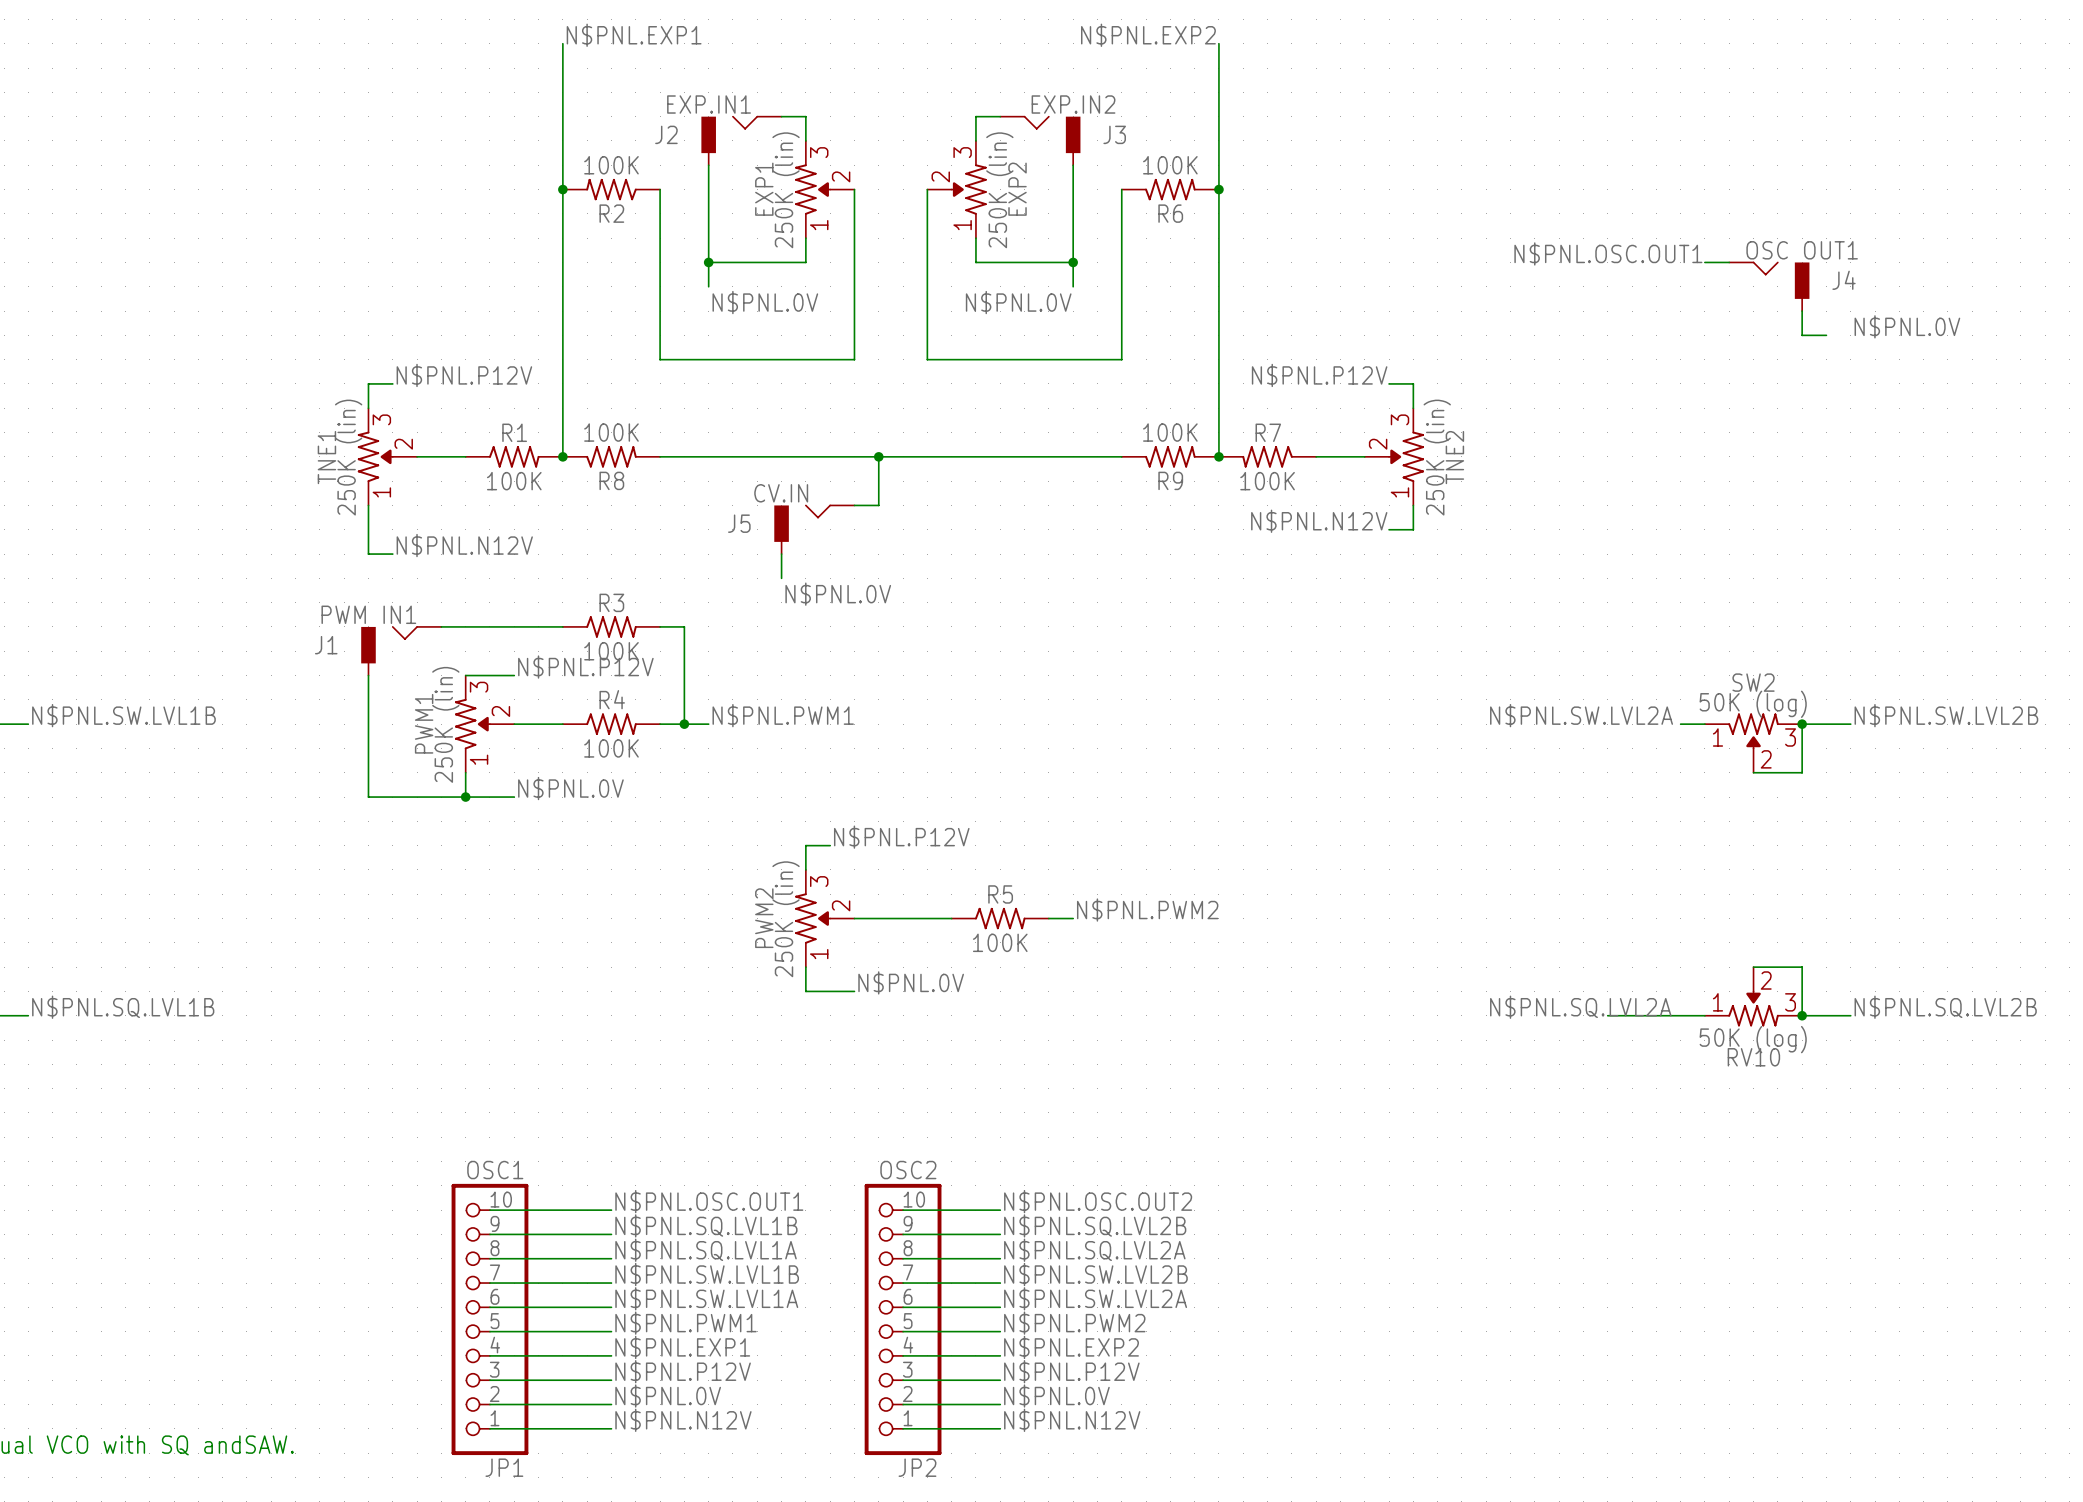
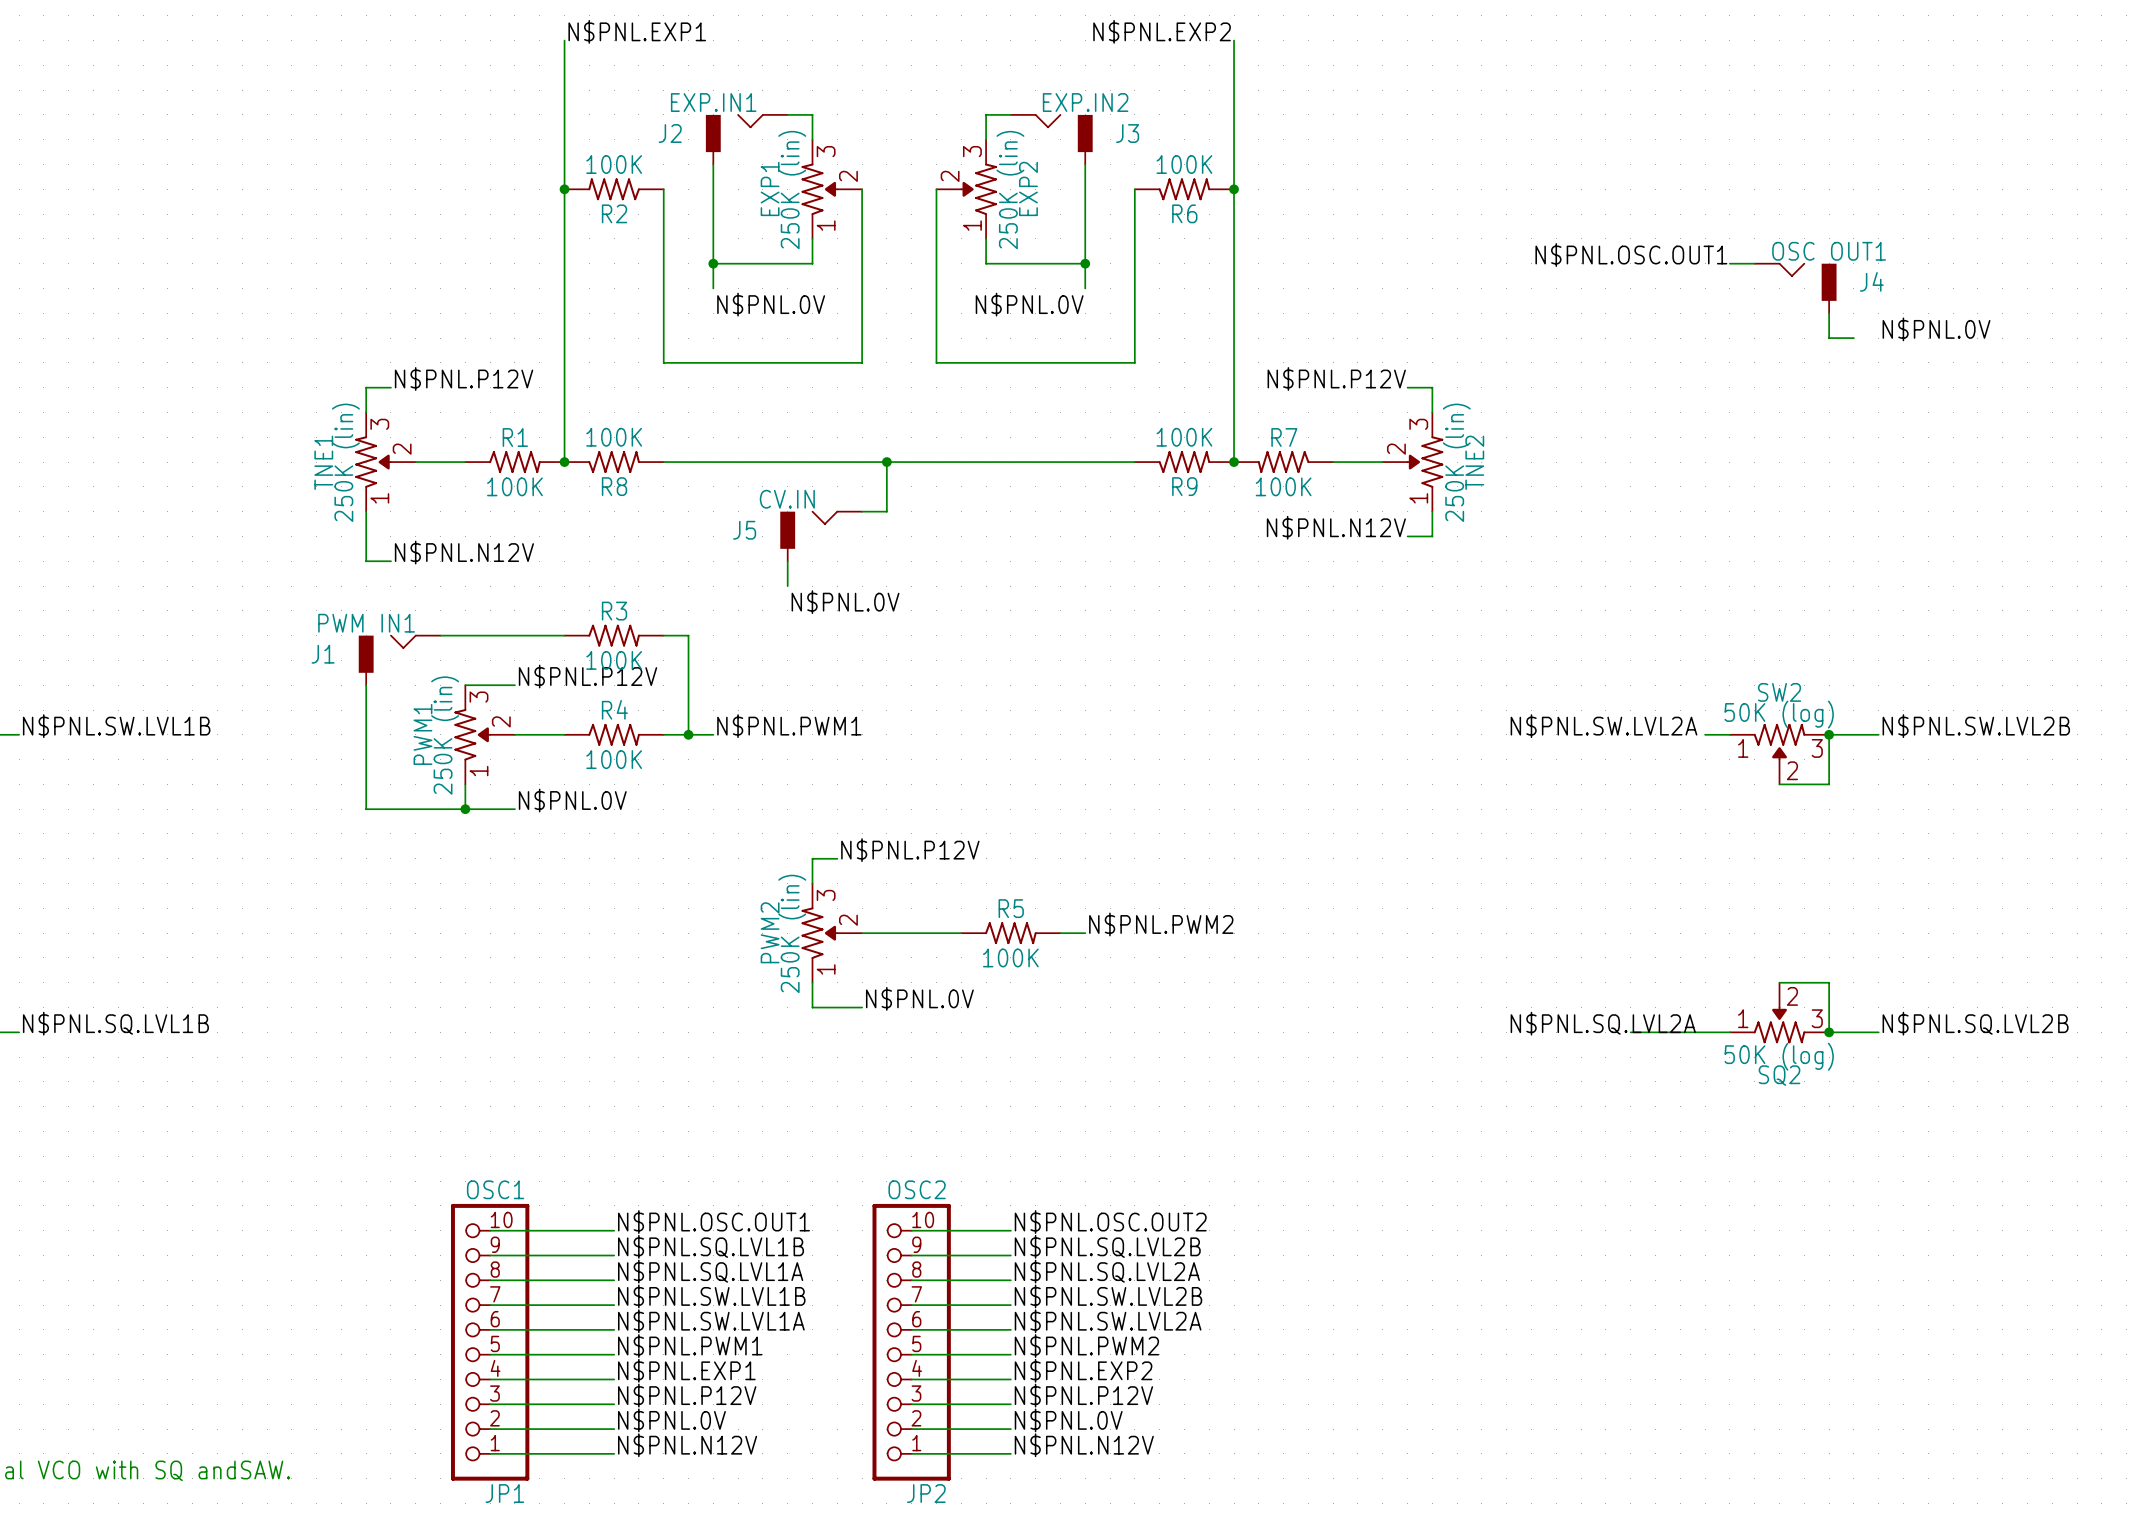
RV10 name: RV10 (1753, 1057) -> SQ2 (1779, 1075)

